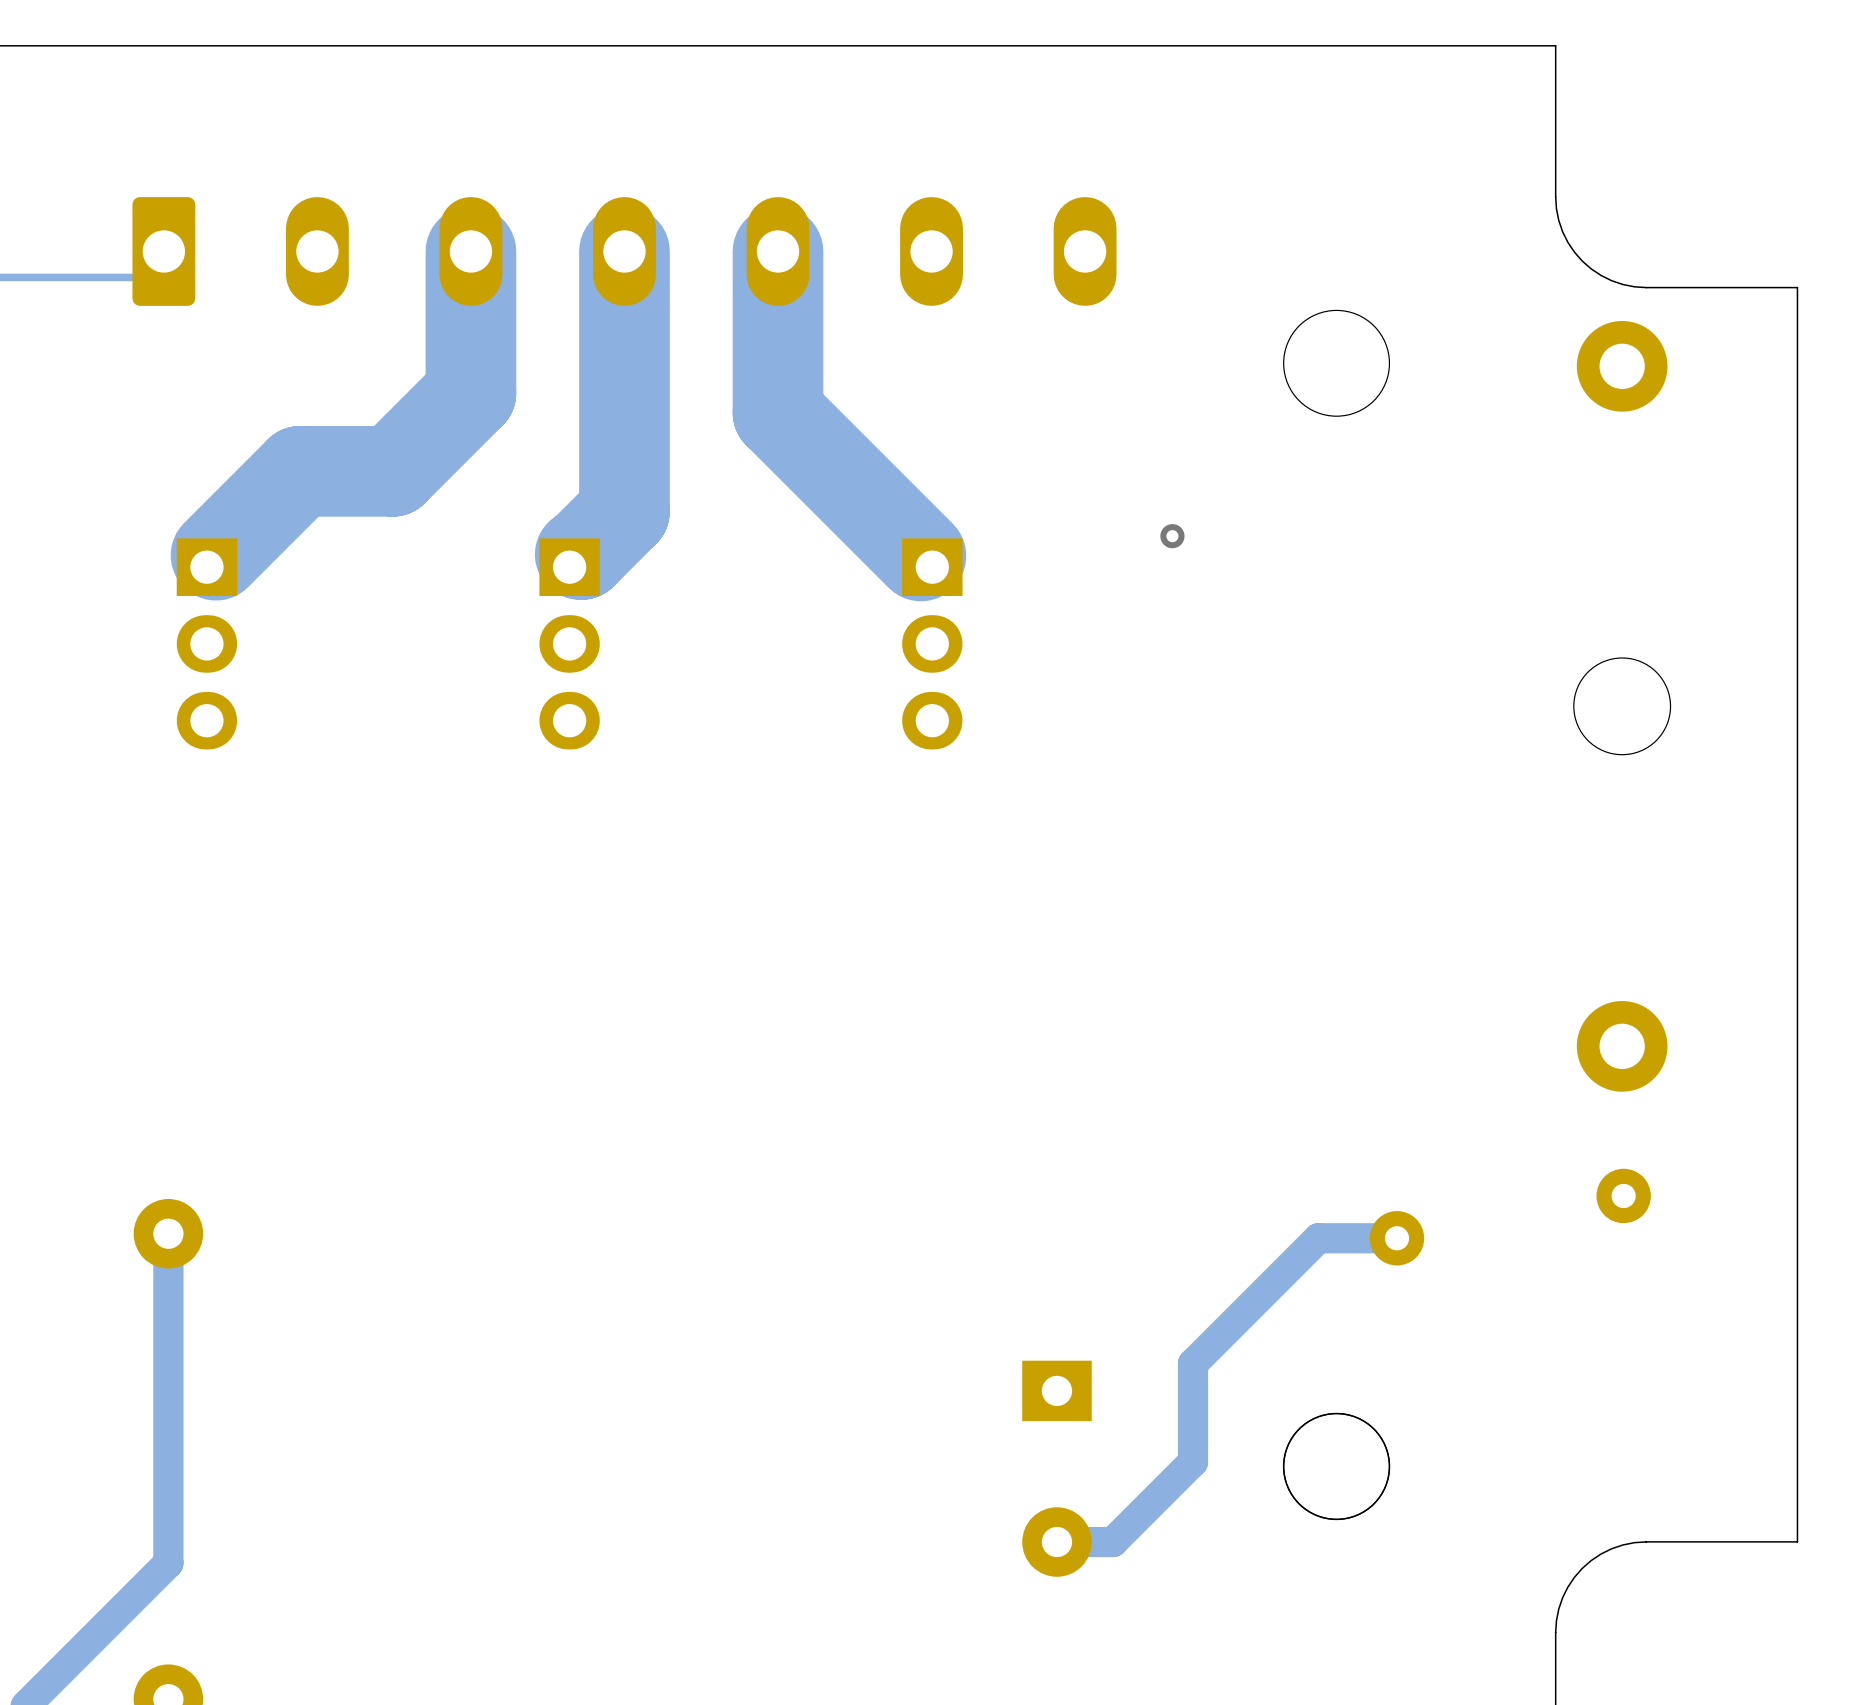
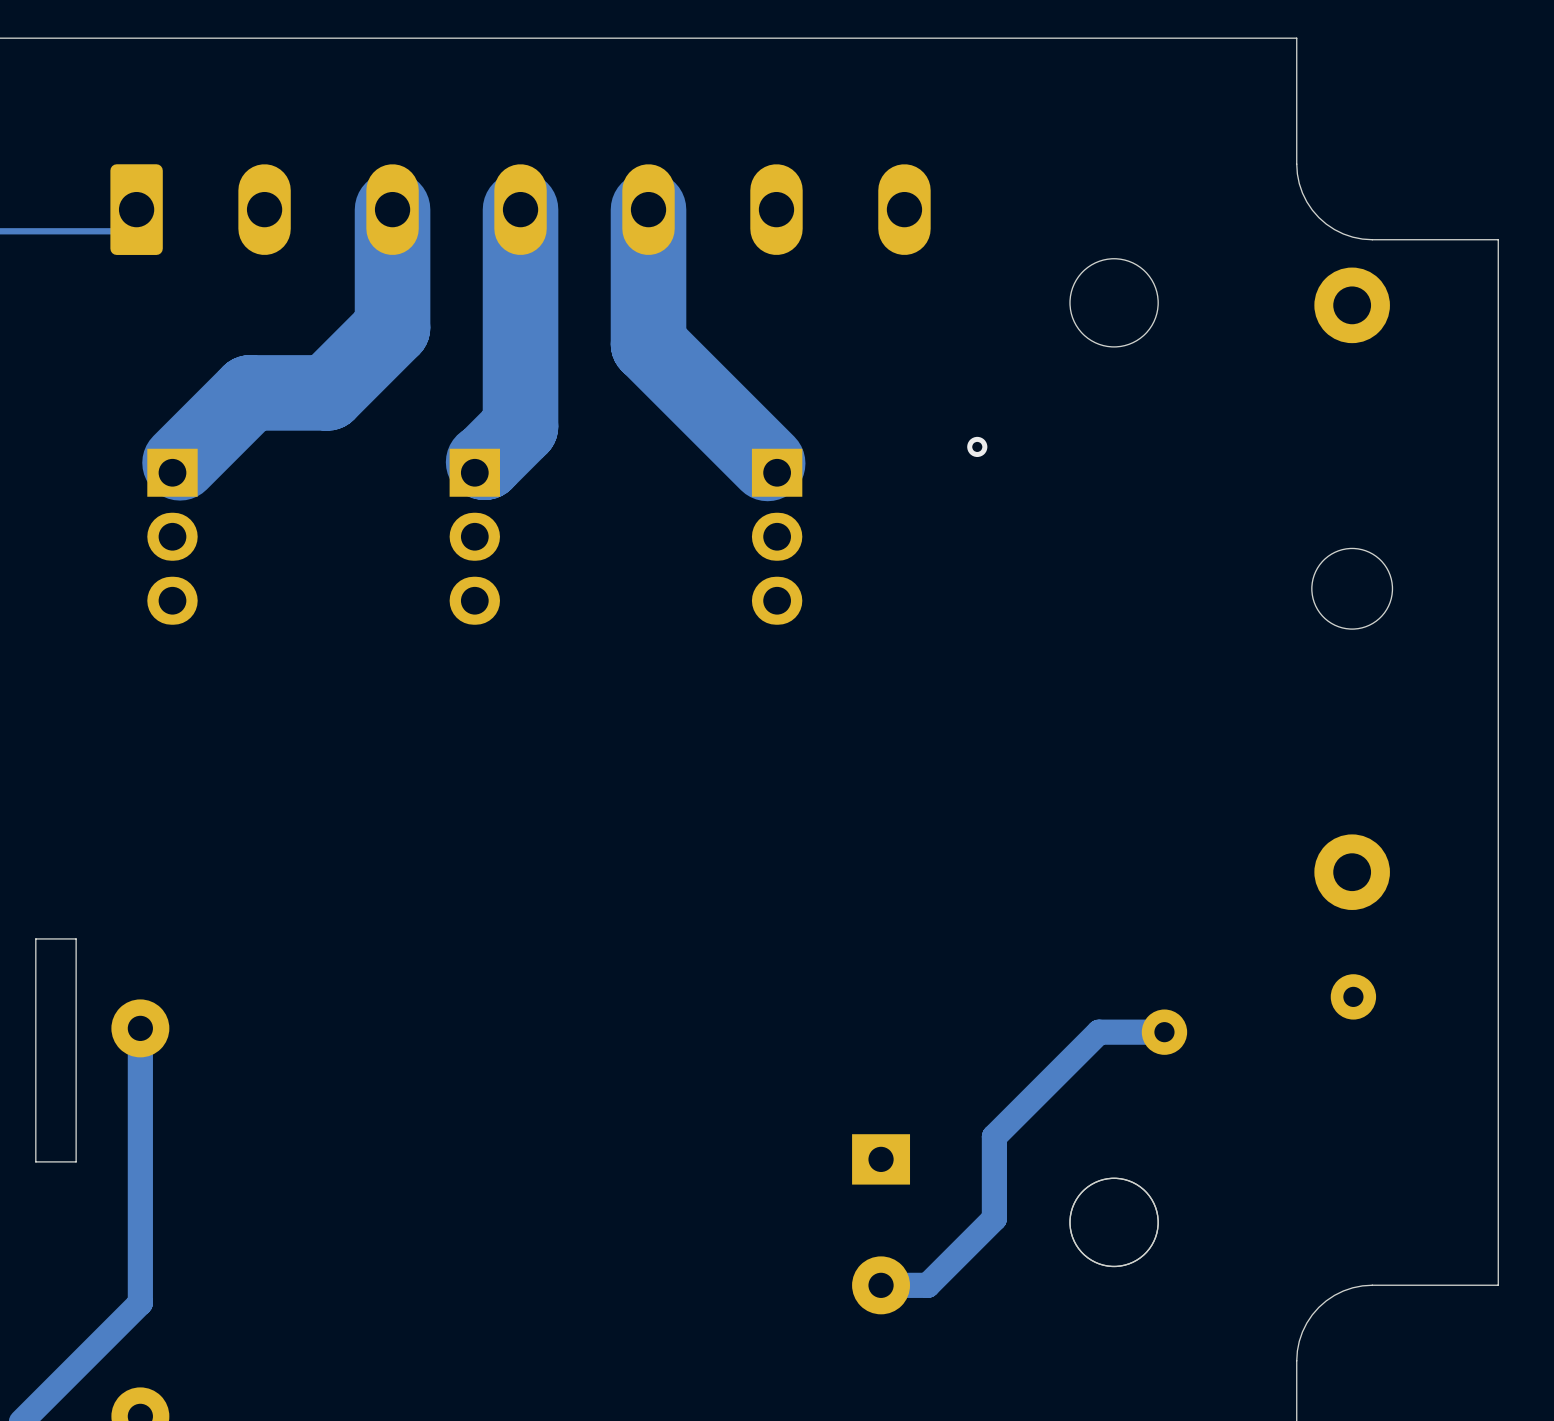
board edge: none -> (76, 938) (35, 938) (35, 1161) (76, 1161) (76, 938)

